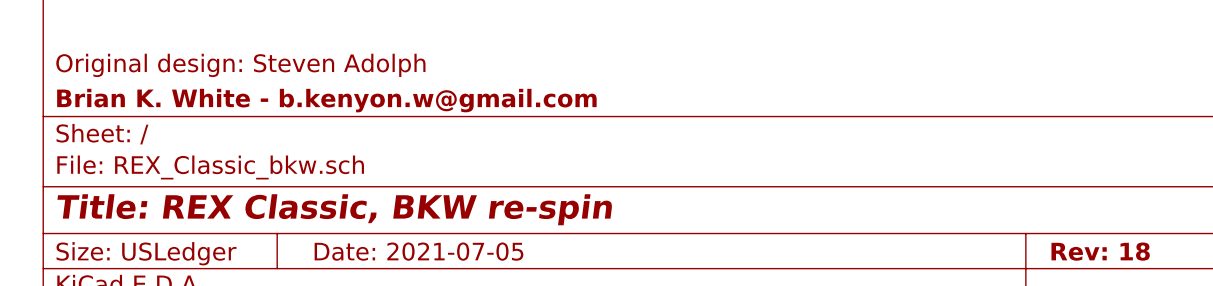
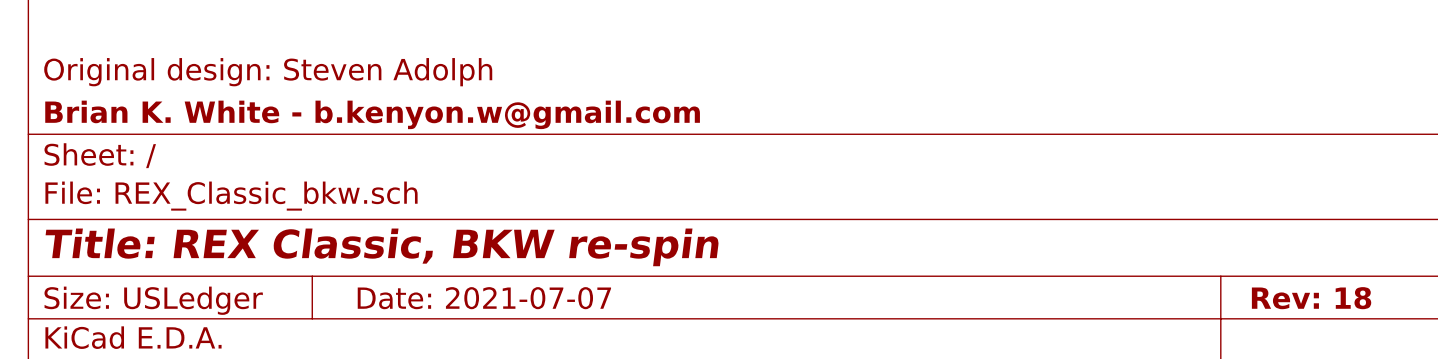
title block: Date: 2021-07-05 (418, 251) -> Date: 2021-07-07 (484, 298)

